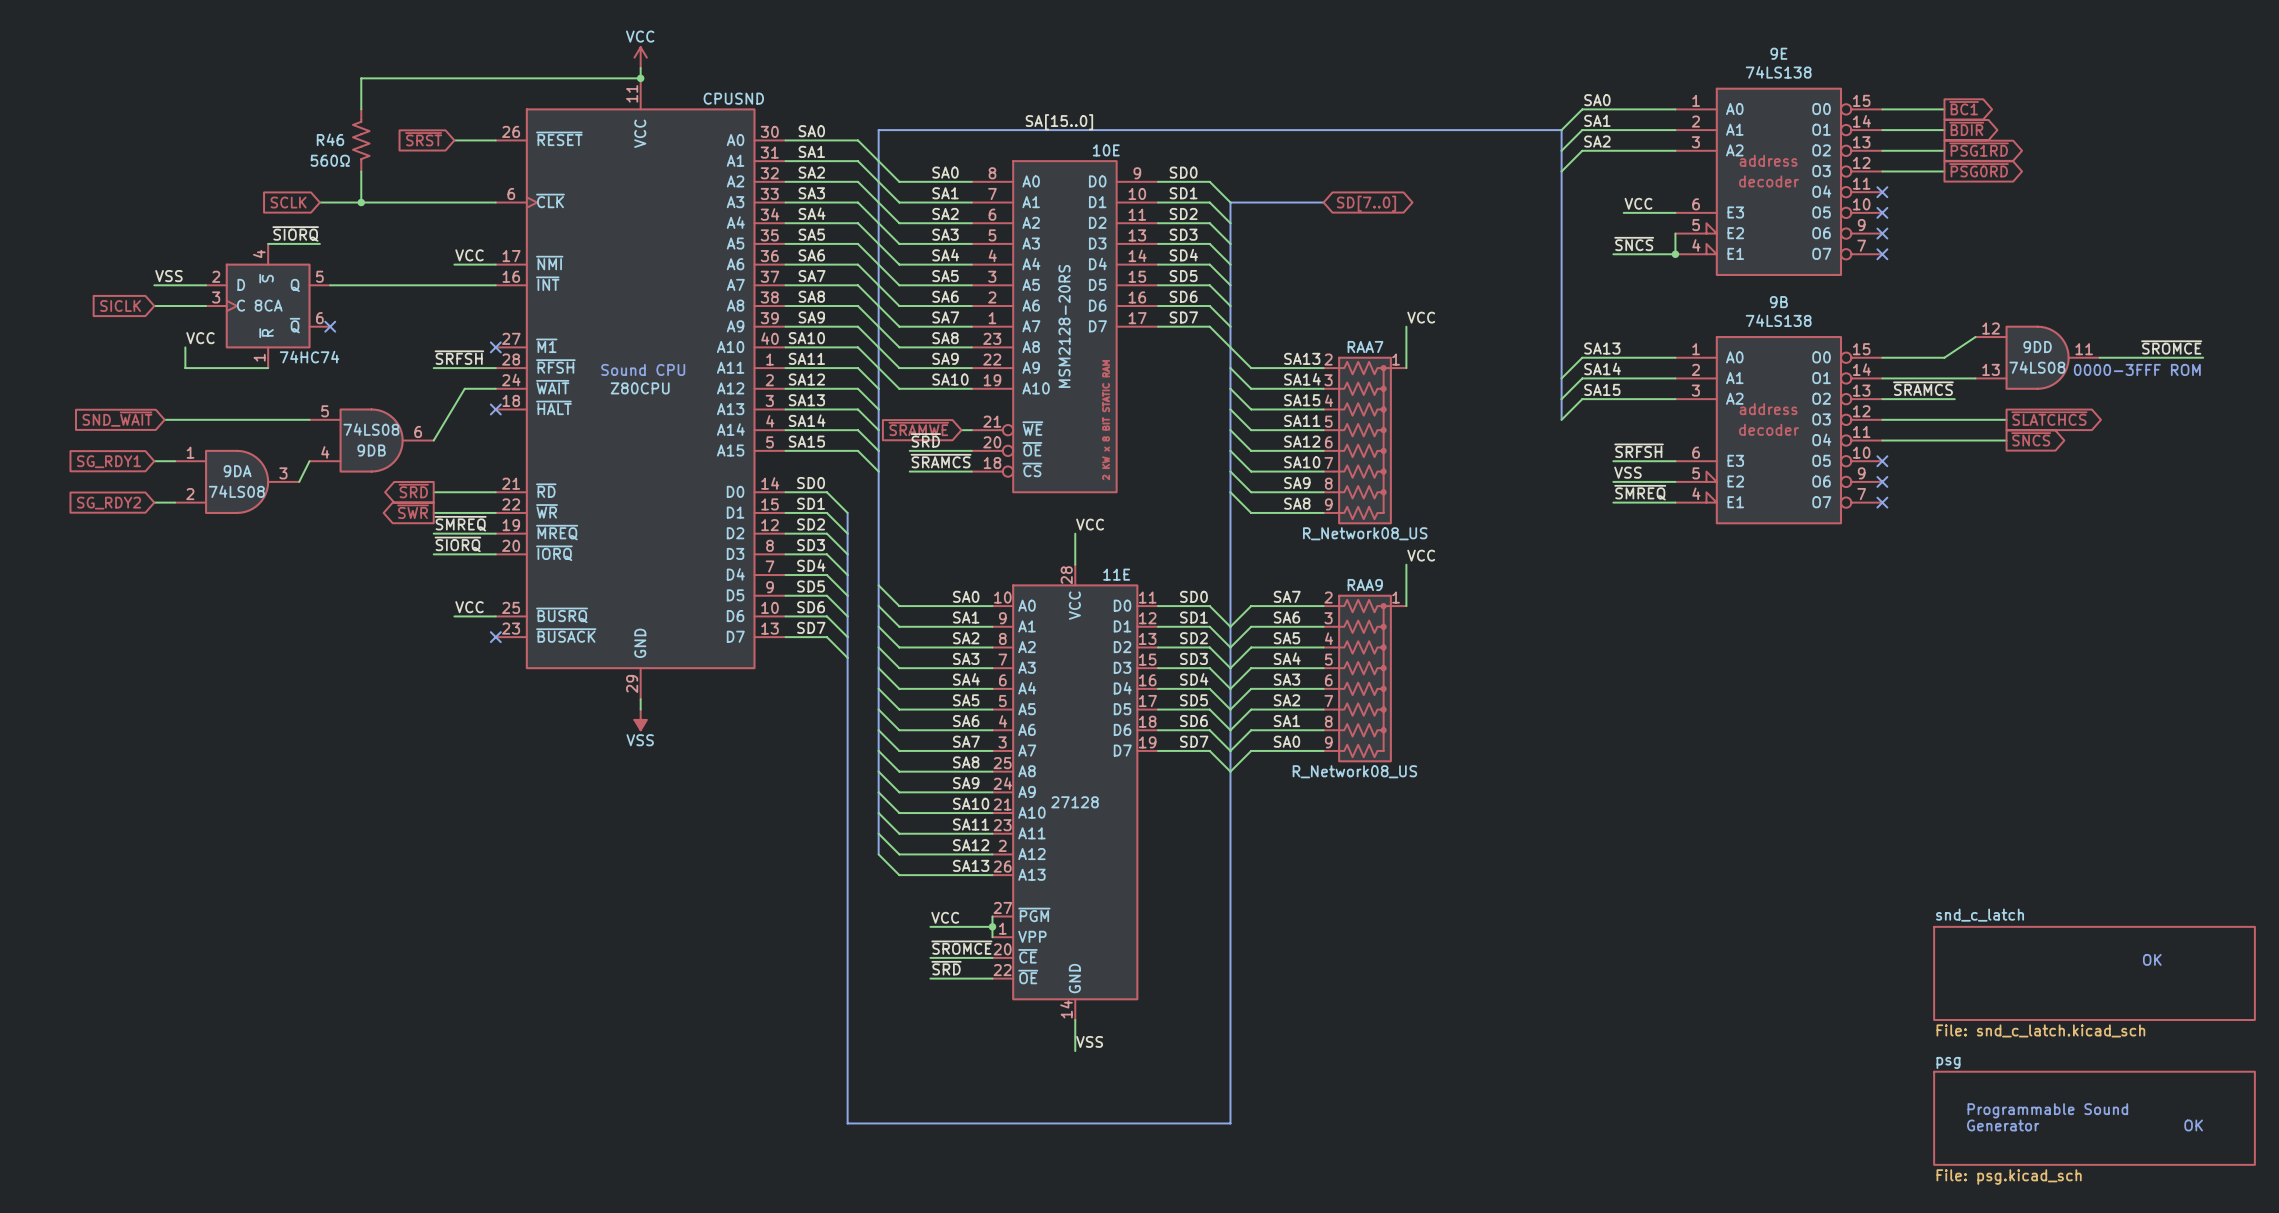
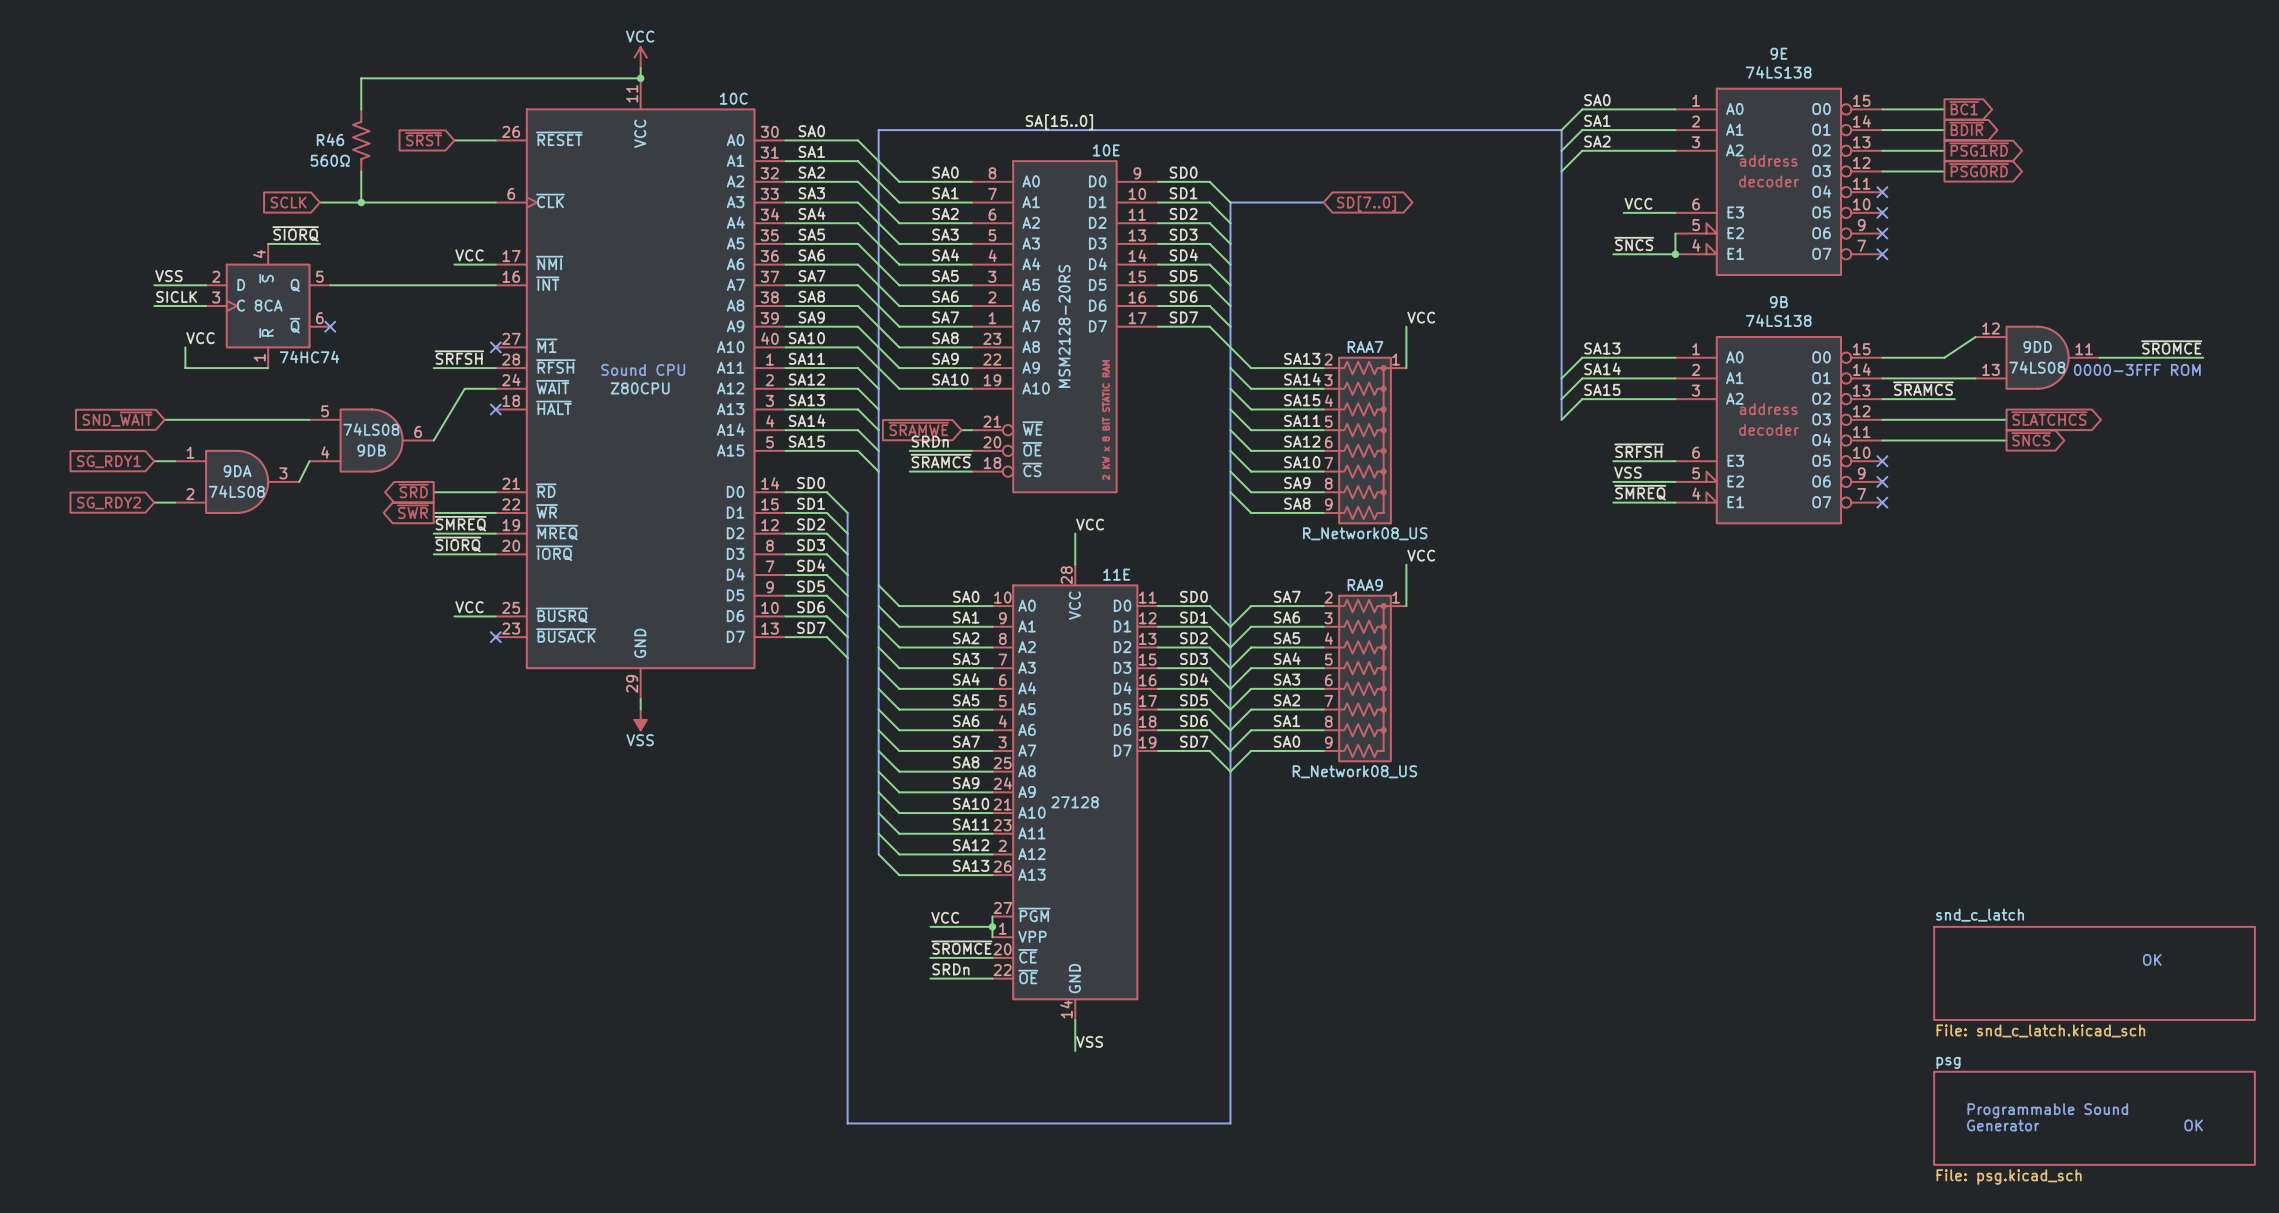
CPUSND name: CPUSND (733, 98) -> 10C (733, 98)
label: none -> SICLK (176, 296)
global label: SICLK (120, 306) -> none
label: ~{SRD} (925, 440) -> SRDn (930, 441)
label: ~{SRD} (946, 968) -> SRDn (950, 969)

